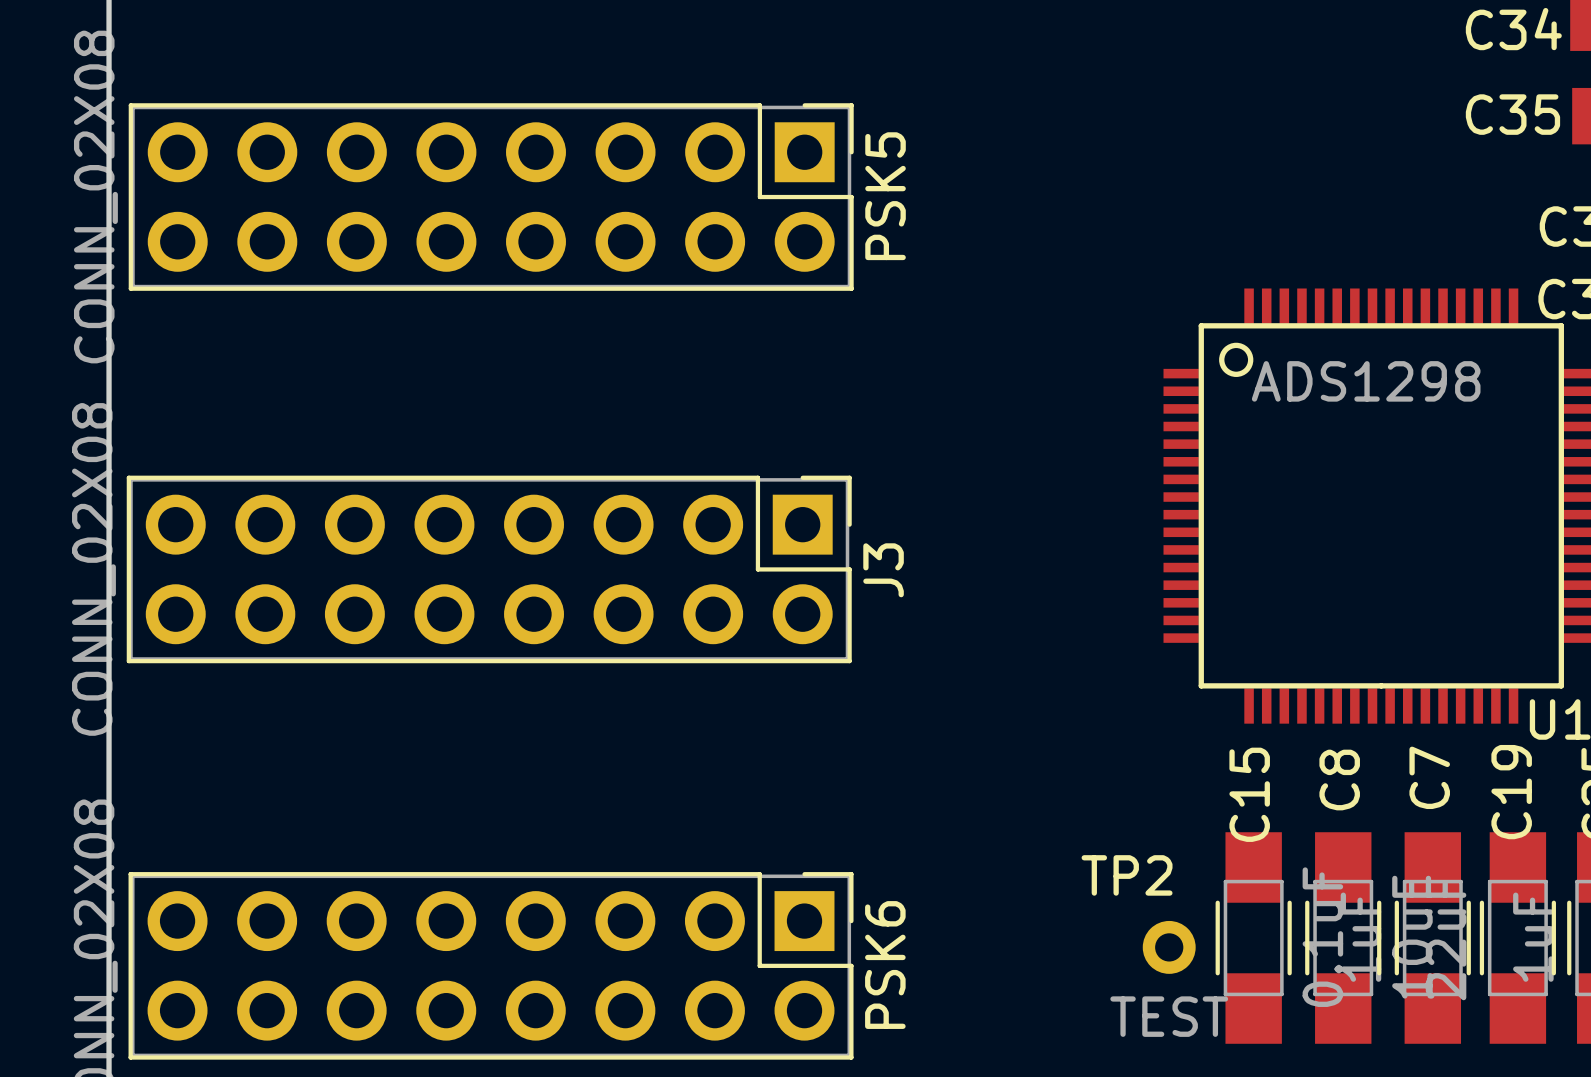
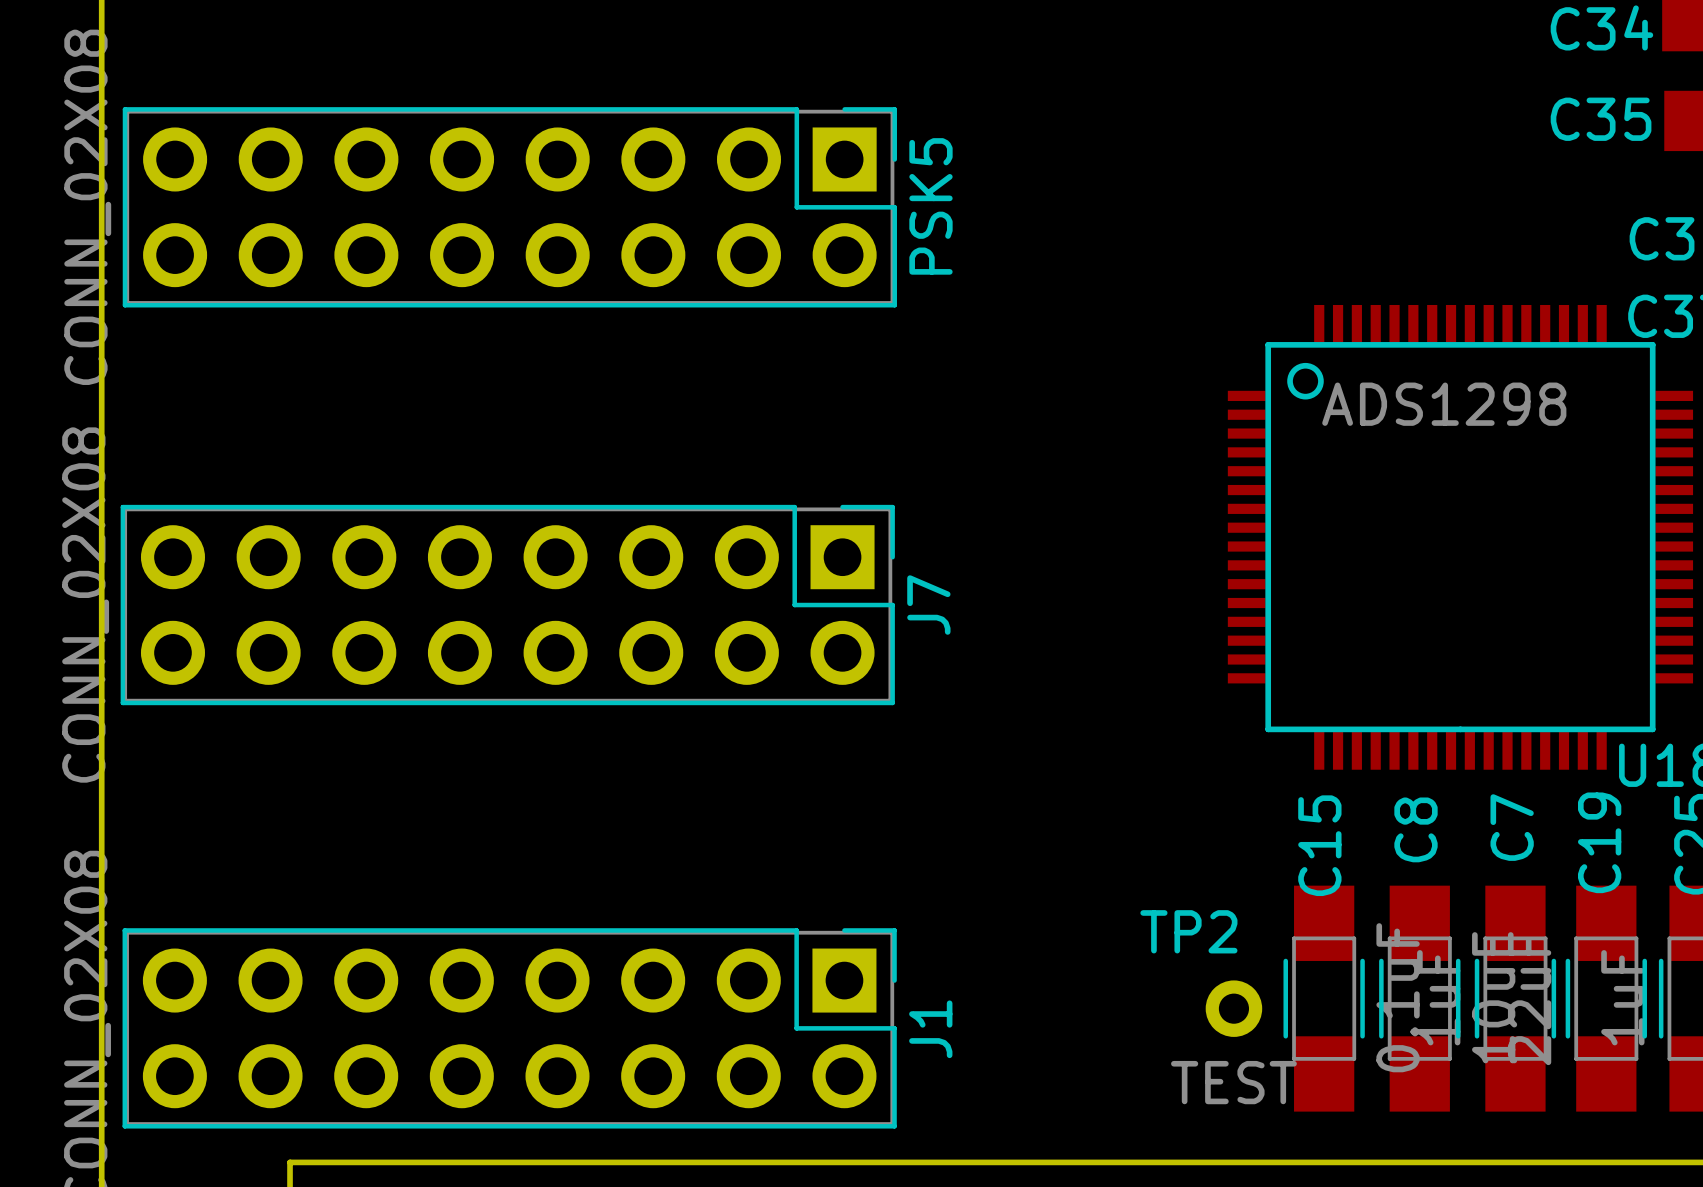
J3 name: J3 (883, 570) -> J7 (928, 605)
PSK6 name: PSK6 (885, 965) -> J1 (930, 1029)

